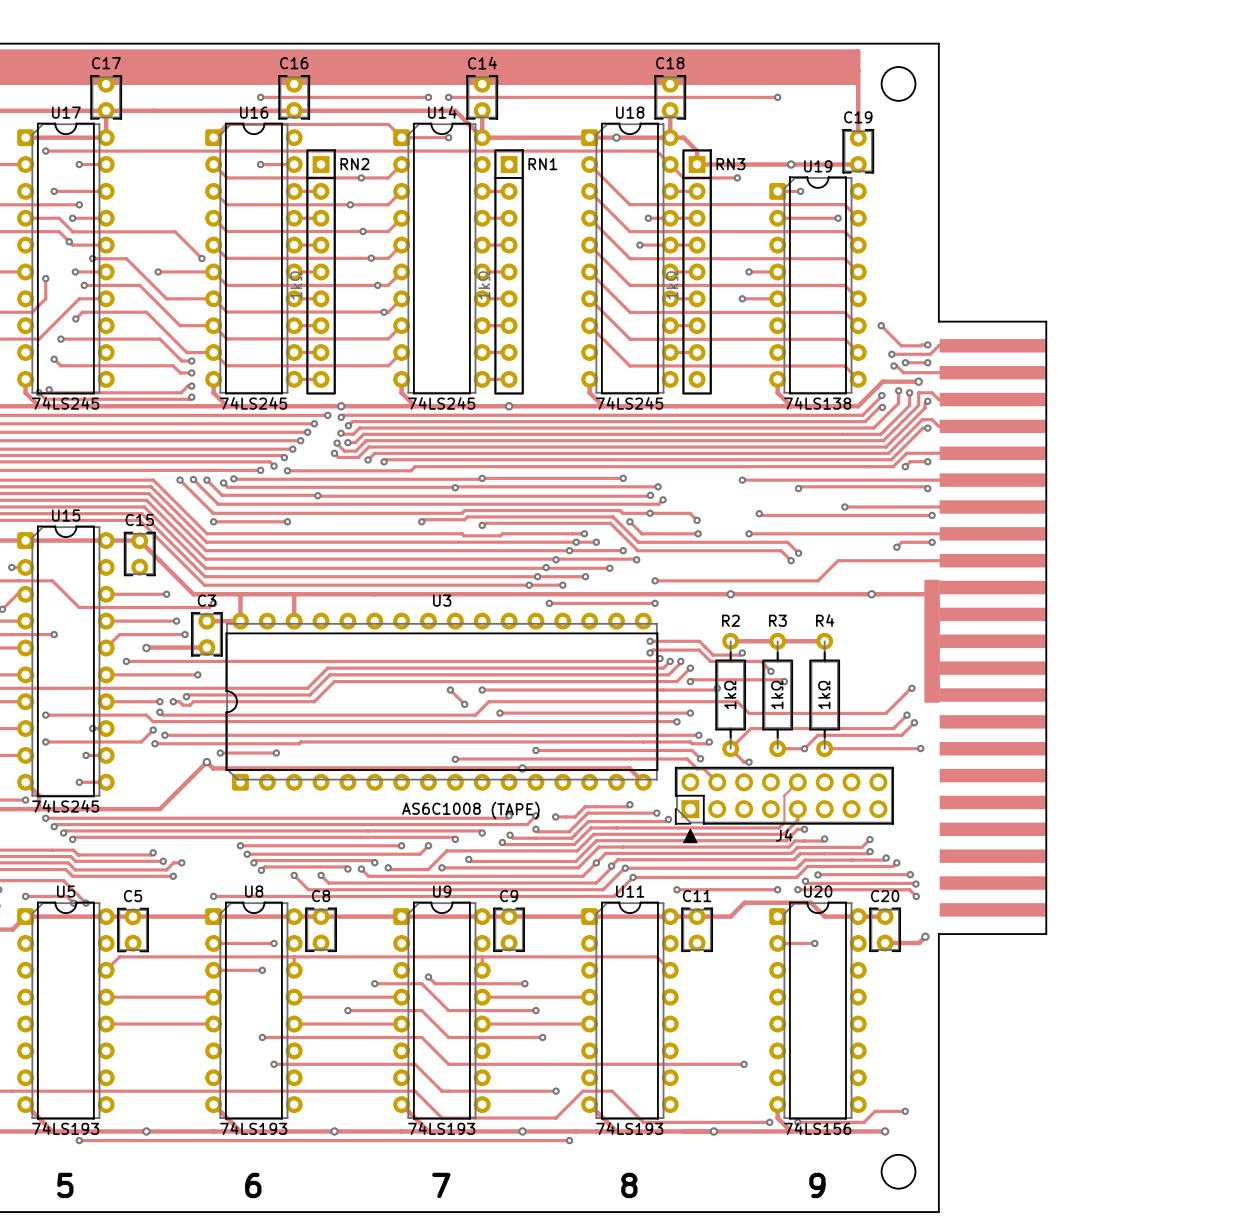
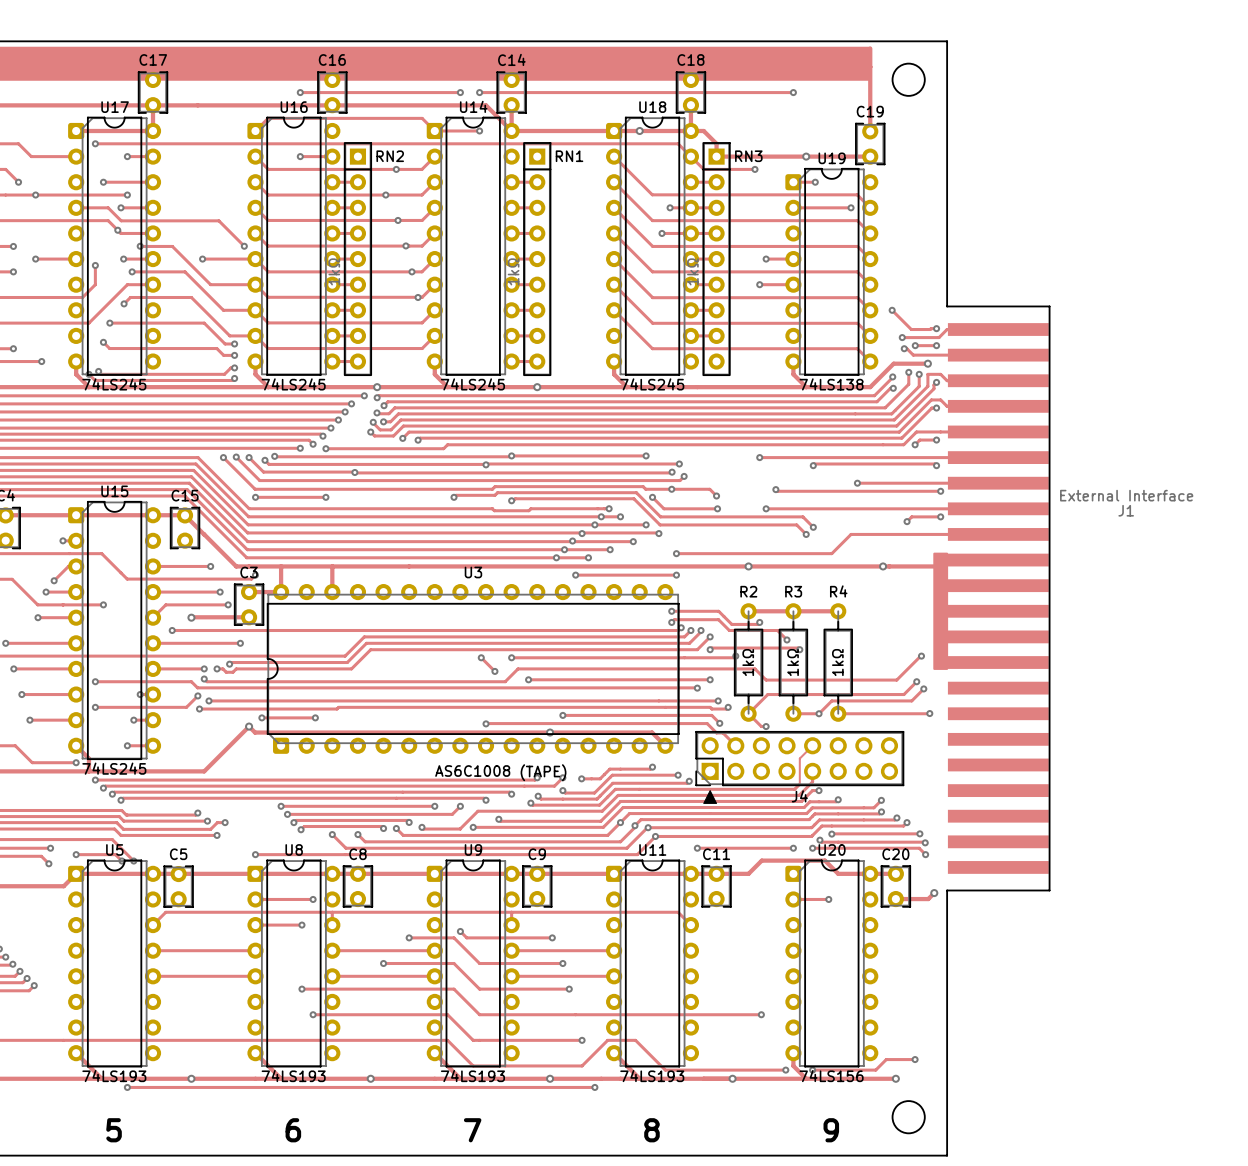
J1 value: none -> External Interface (1126, 495)
J1 name: none -> J1 (1126, 510)

